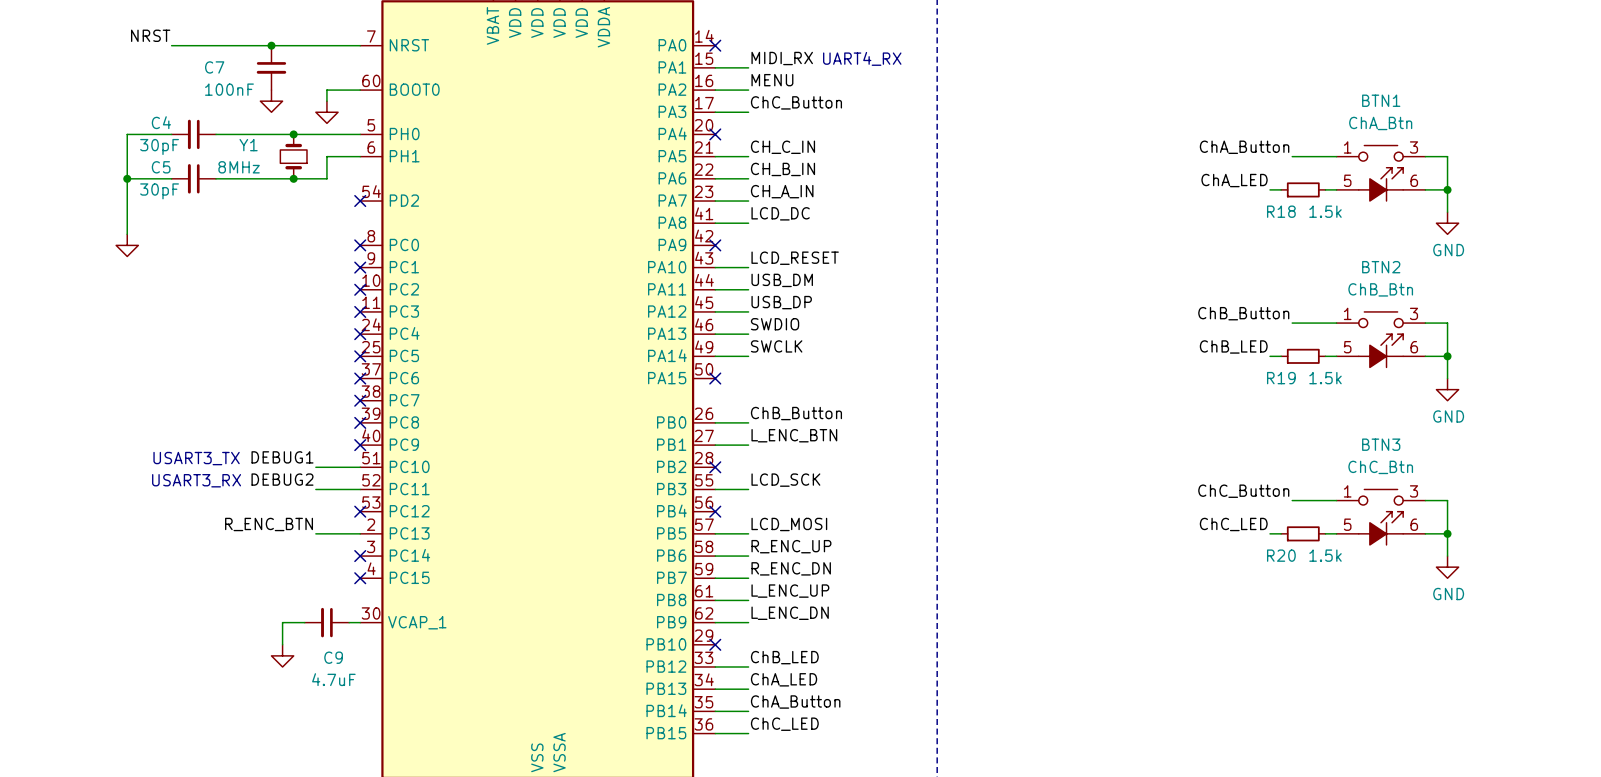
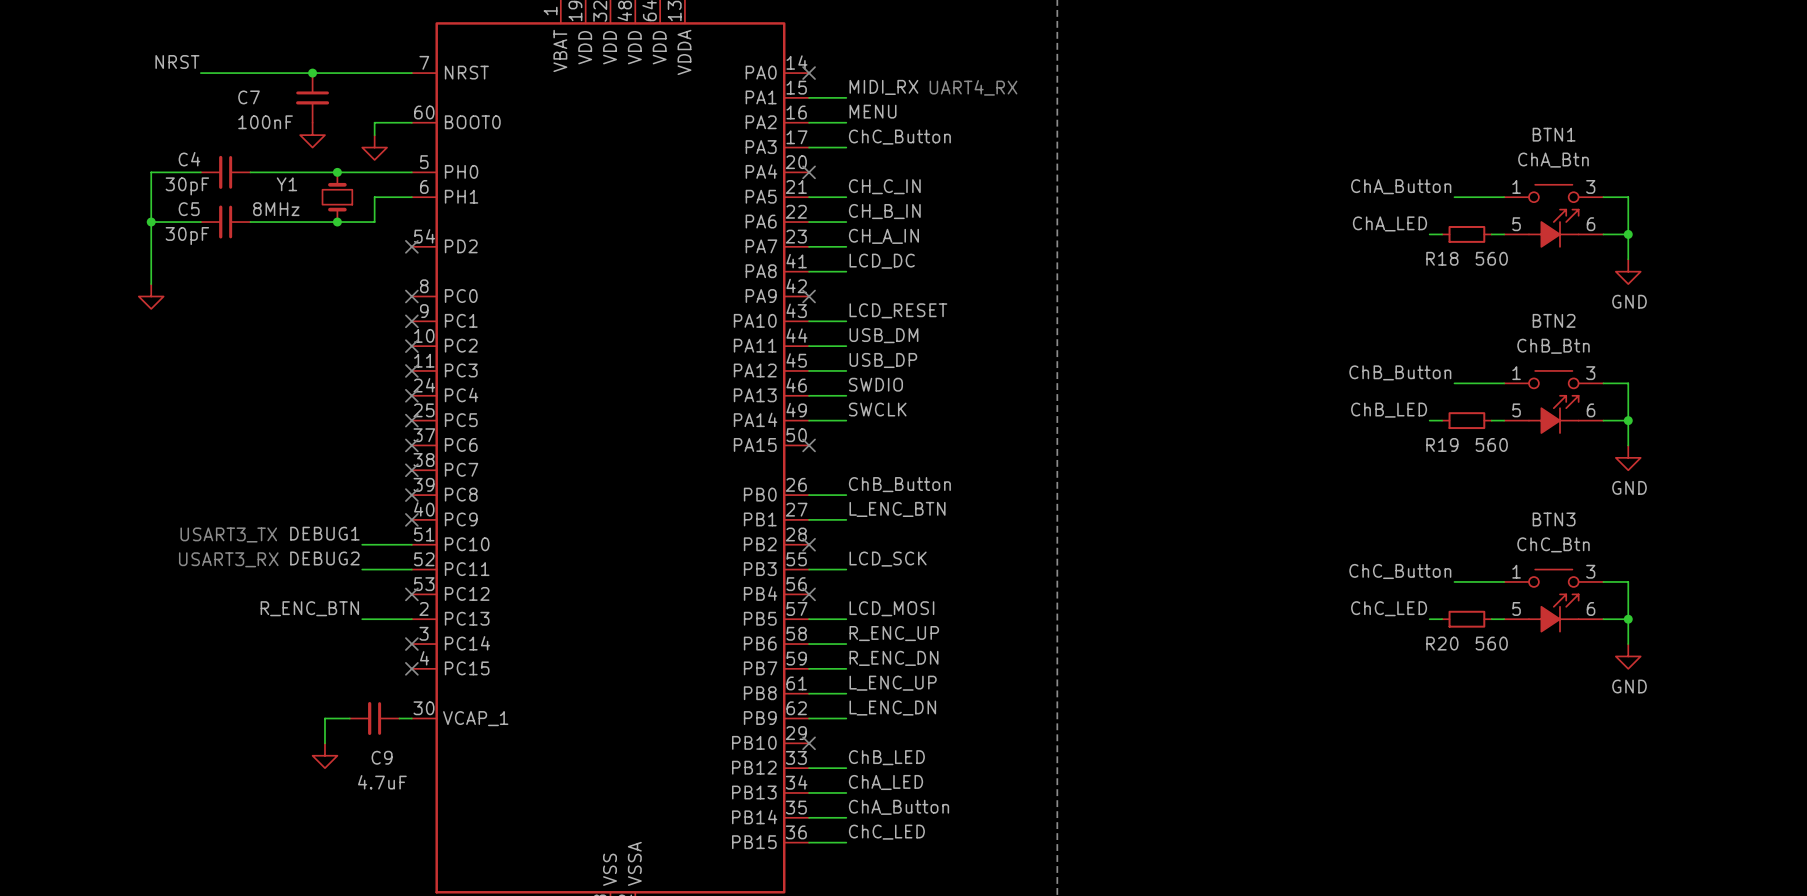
R18 value: 1.5k (1325, 211) -> 560 (1491, 258)
R19 value: 1.5k (1325, 378) -> 560 (1491, 444)
R20 value: 1.5k (1325, 555) -> 560 (1491, 643)

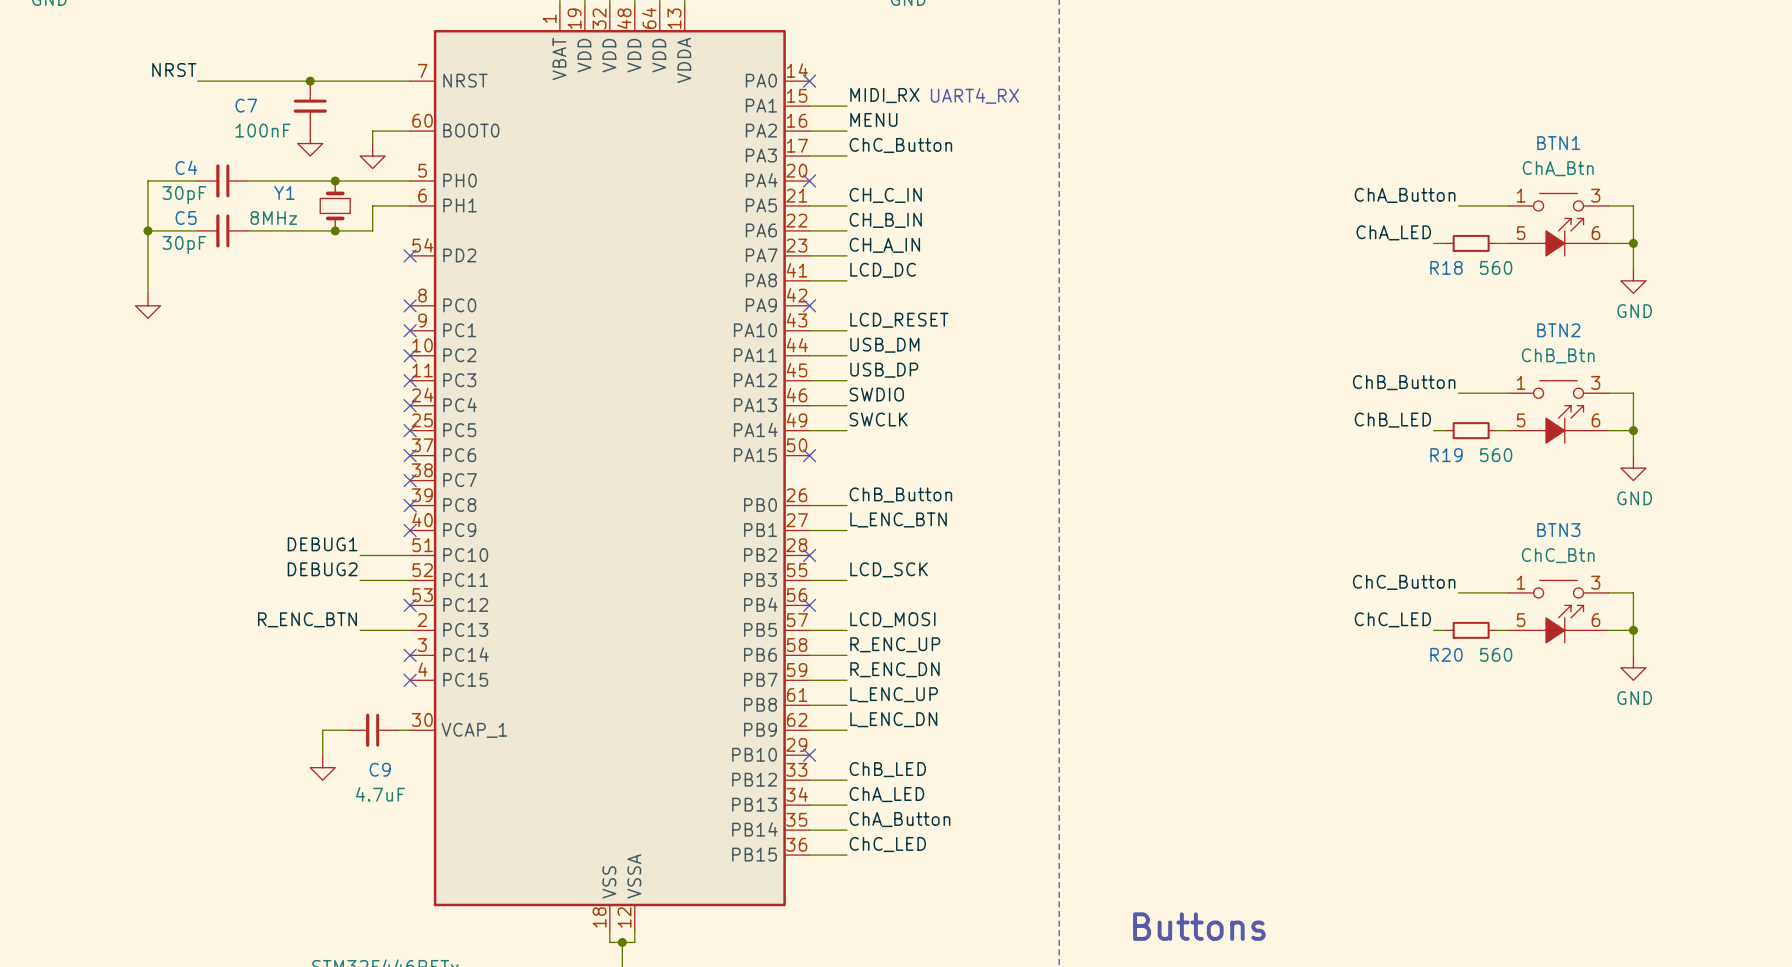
text: USART3_TX (228, 534) -> none
text: USART3_RX (228, 559) -> none

